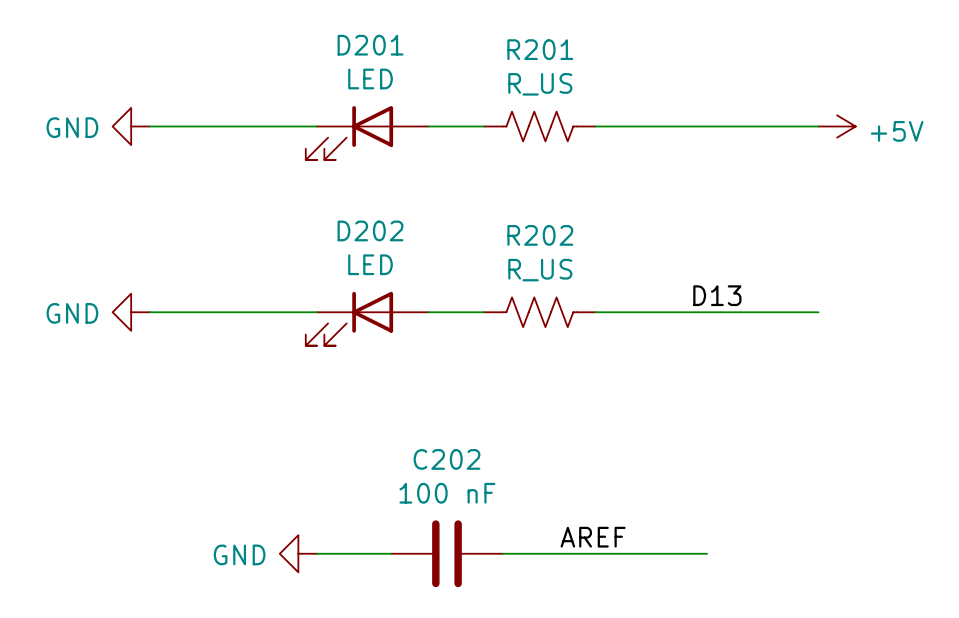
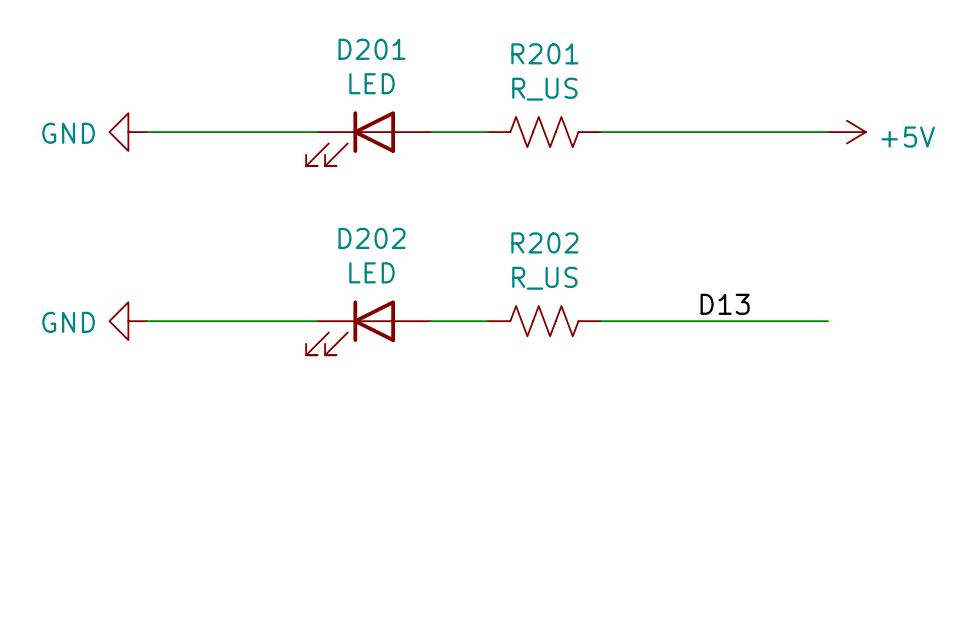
label: AREF (593, 537) -> none
power symbol: GND (298, 553) -> none
wire: (316, 553) (391, 553) -> none
C202: 100 nF (446, 553) -> none
wire: (502, 553) (707, 553) -> none

